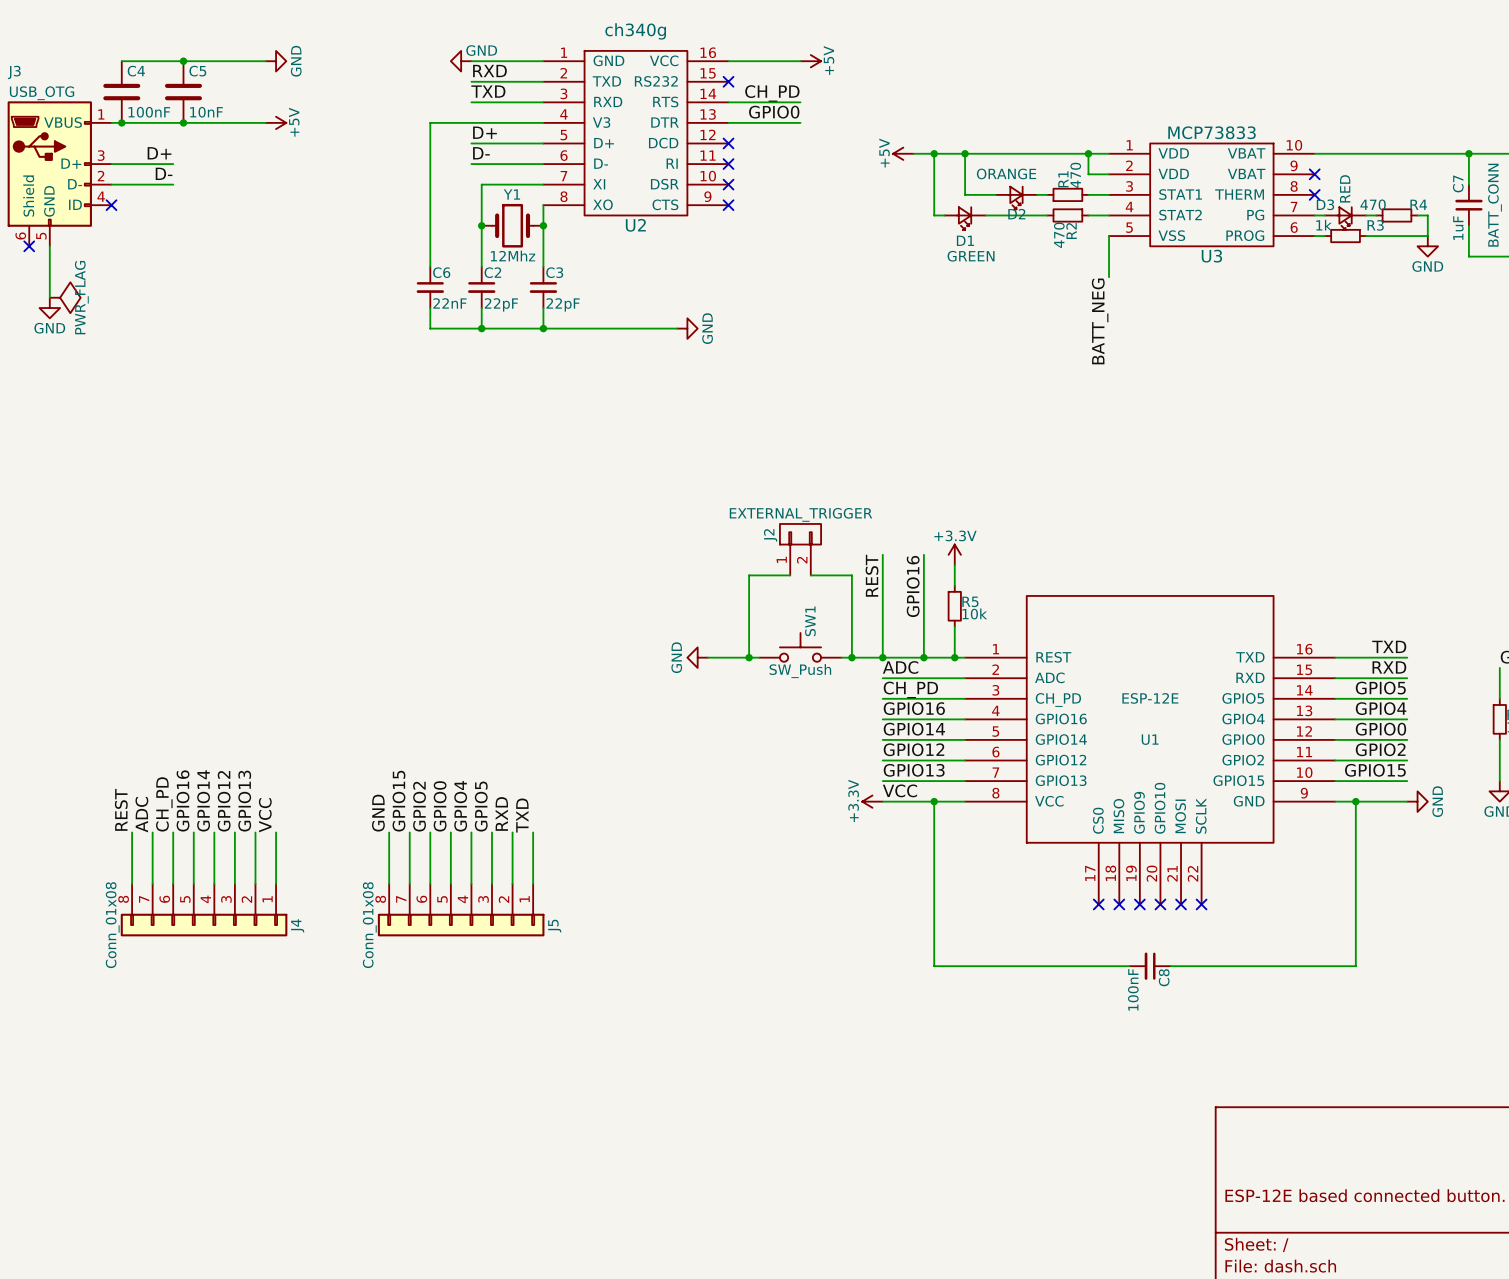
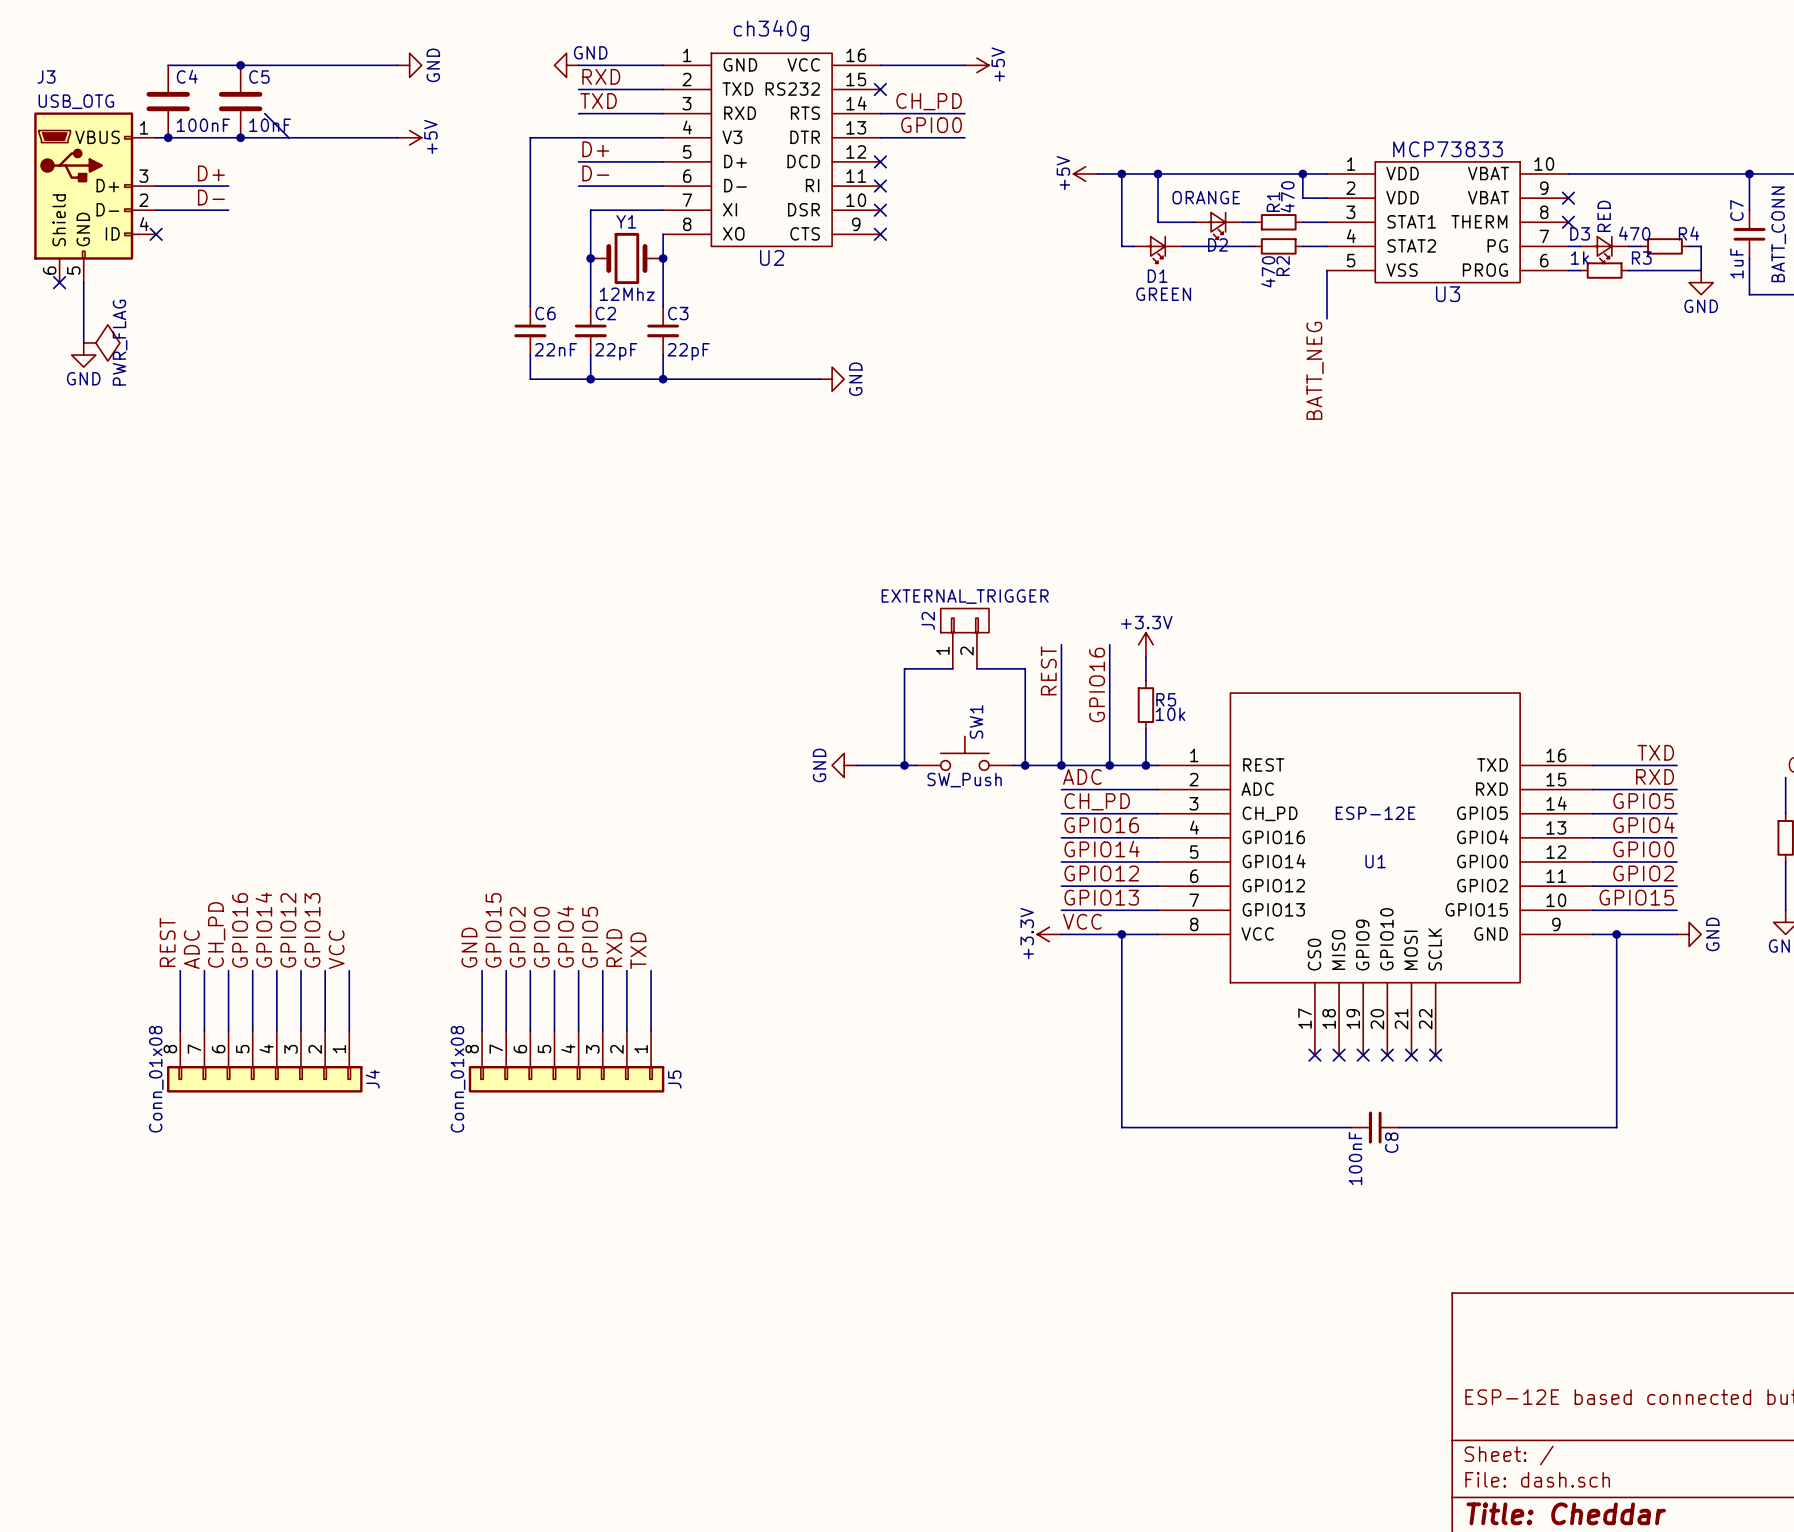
wire: none -> (337, 65) (397, 65)
power symbol position: GND (276, 61) -> GND (409, 65)
wire: none -> (264, 113) (288, 137)
wire: none -> (337, 137) (397, 137)
power symbol position: +5V (276, 122) -> +5V (409, 137)

